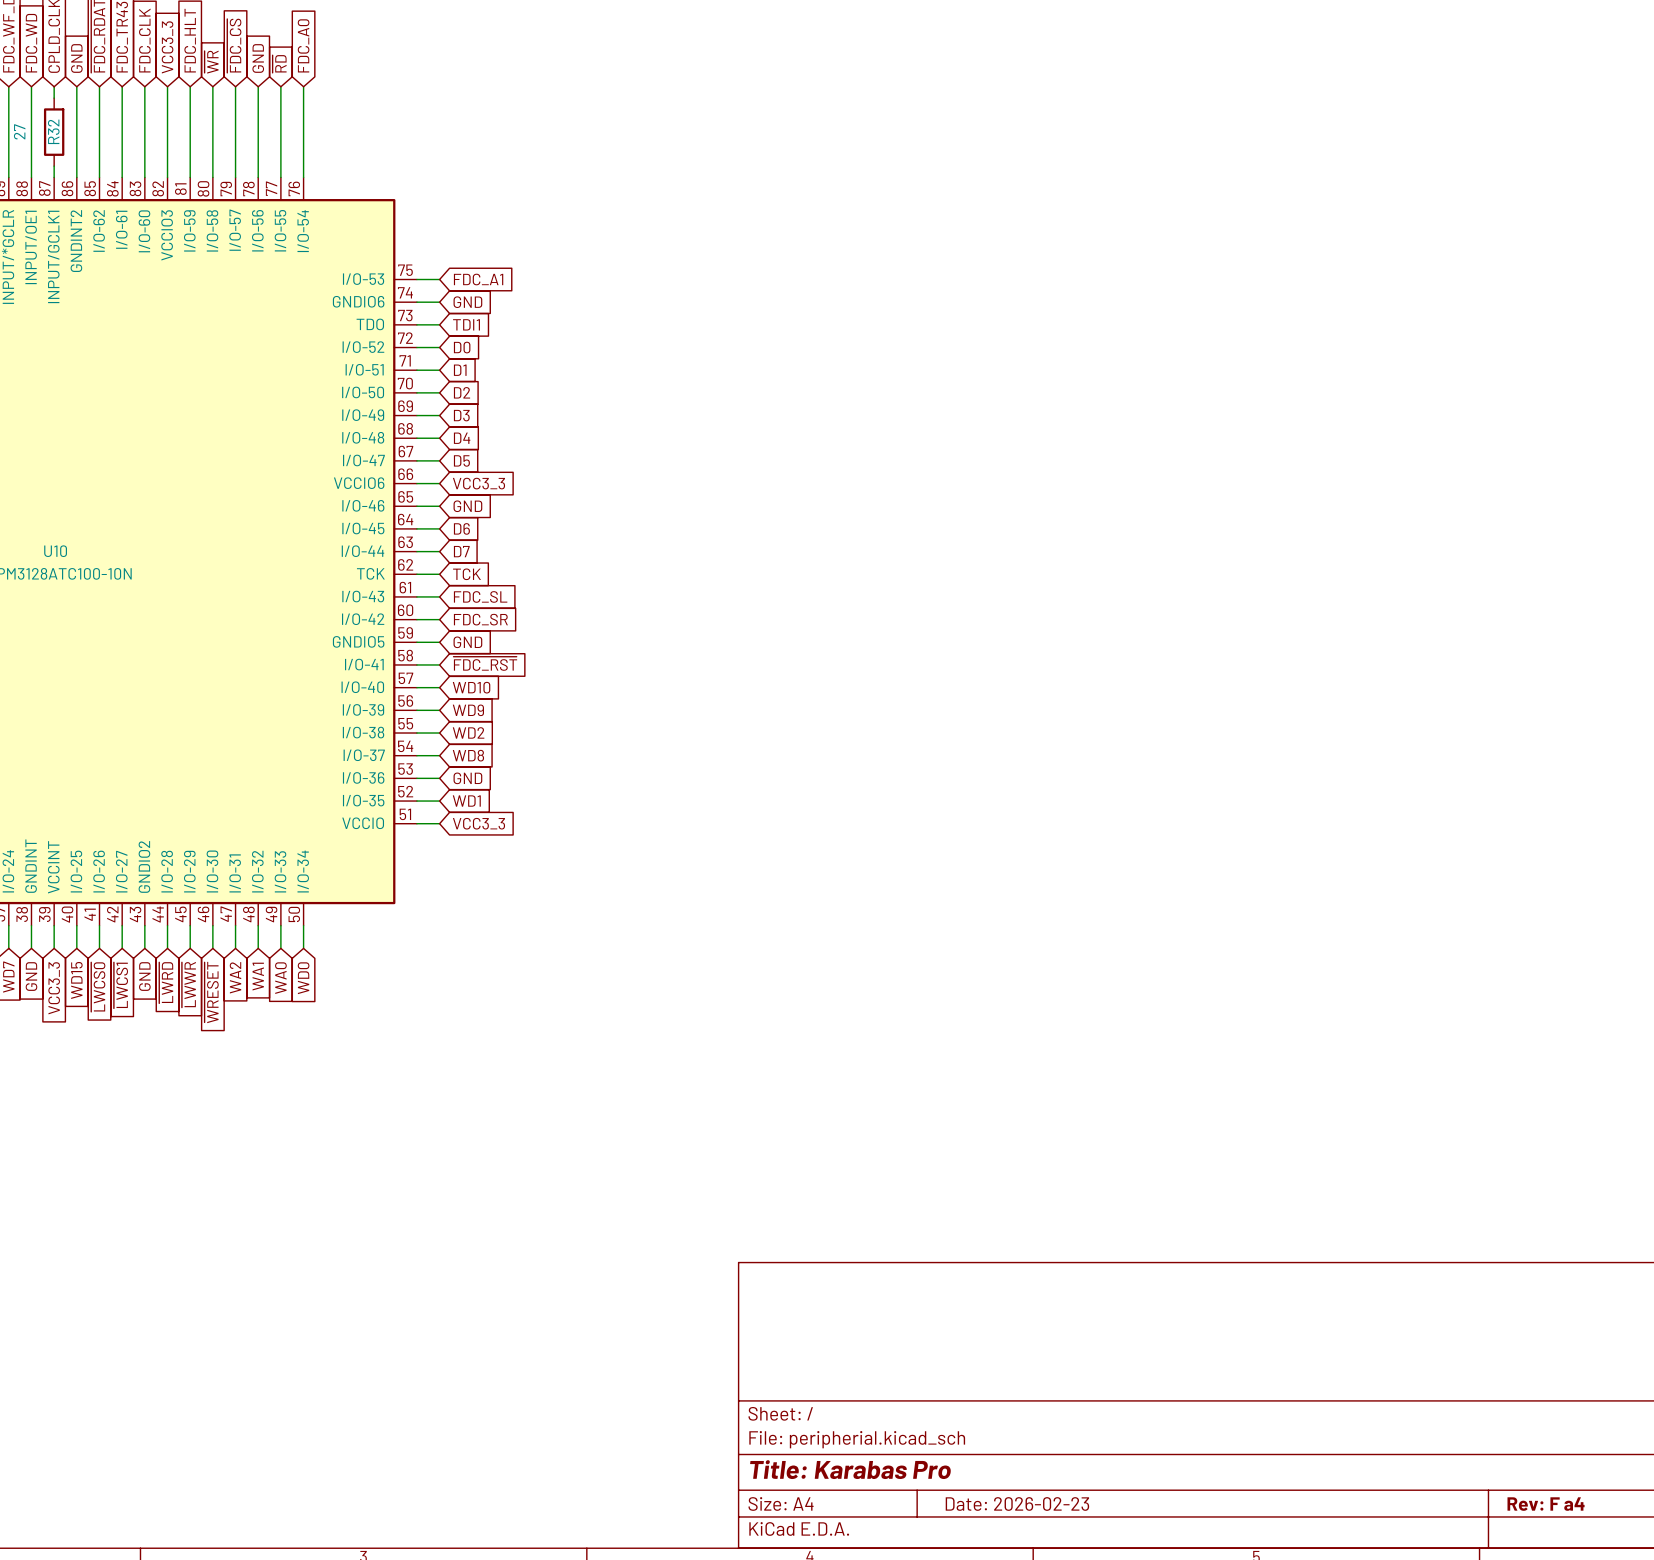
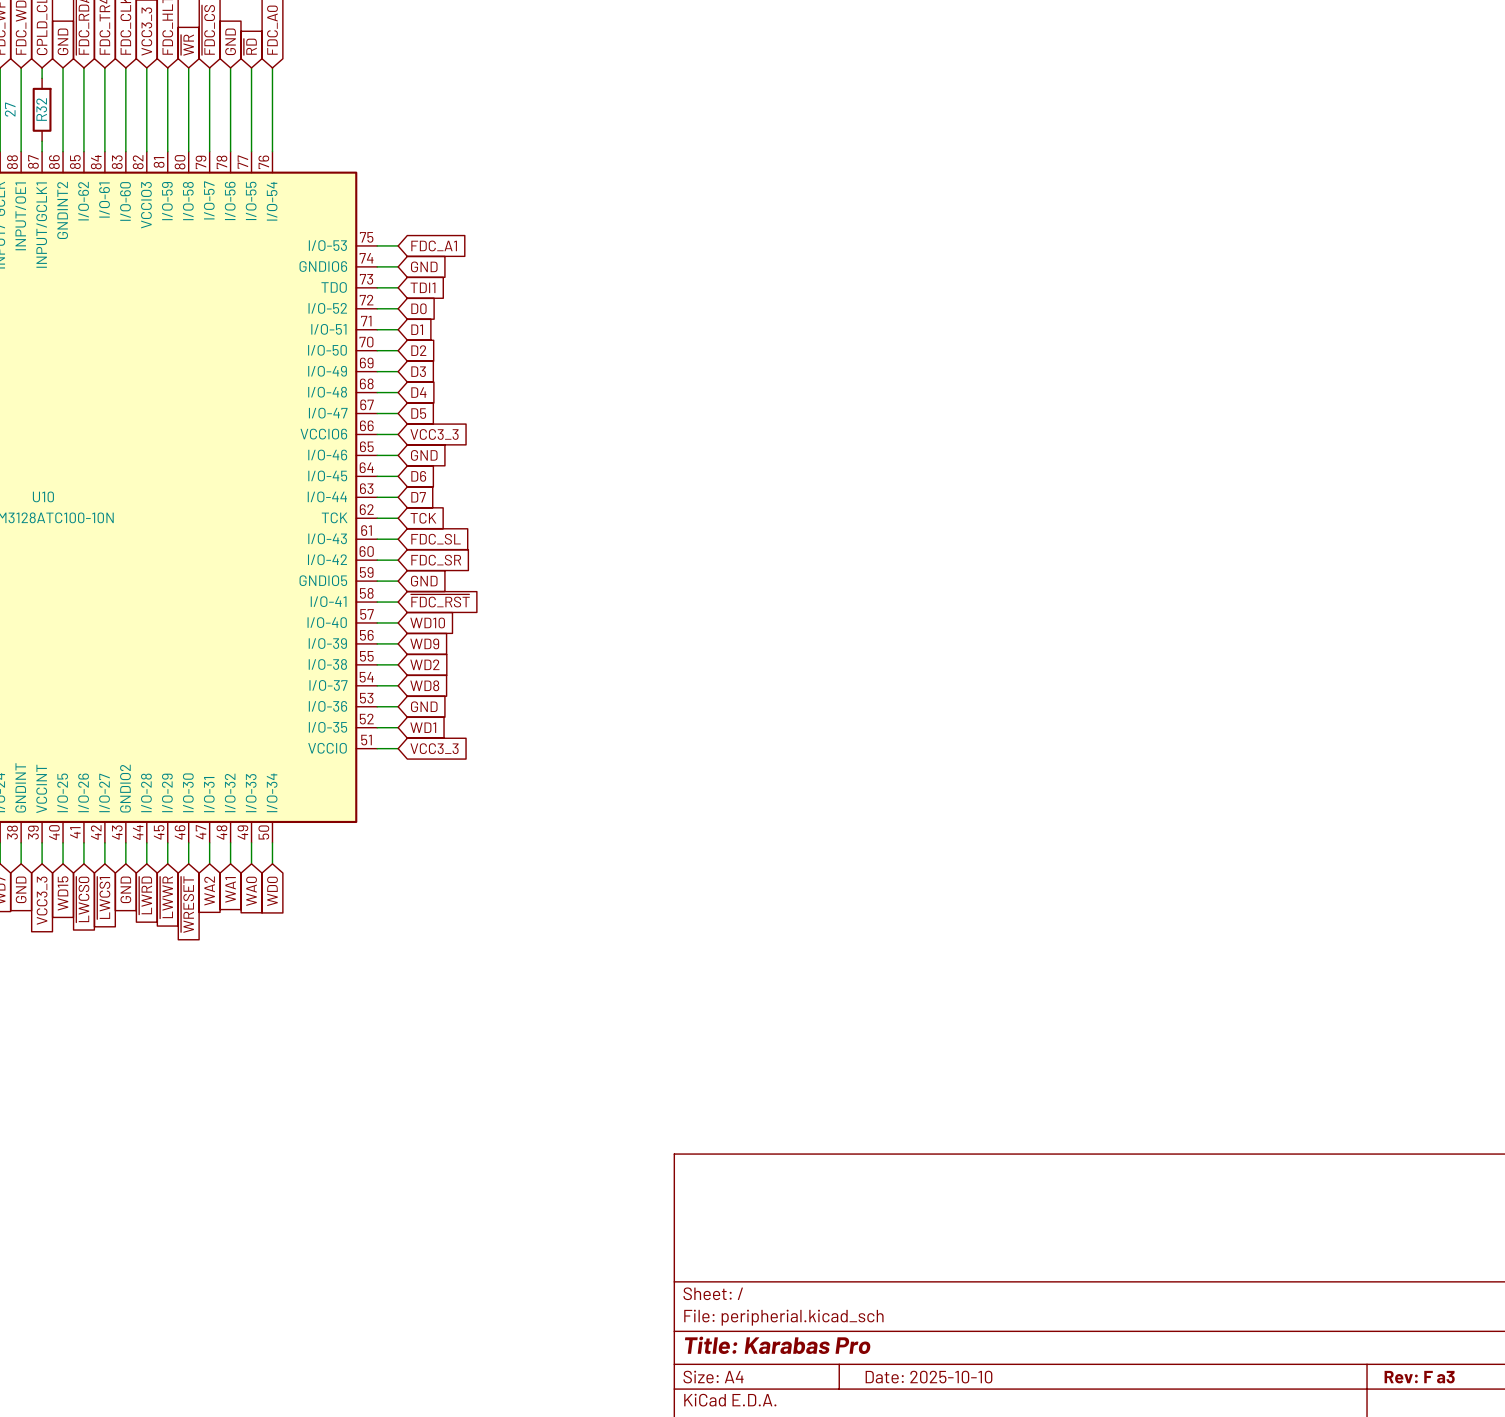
title block: Date: 2026-02-23 (1017, 1503) -> Date: 2025-10-10 (928, 1377)
title block: Rev: F a4 (1546, 1504) -> Rev: F a3 (1419, 1377)

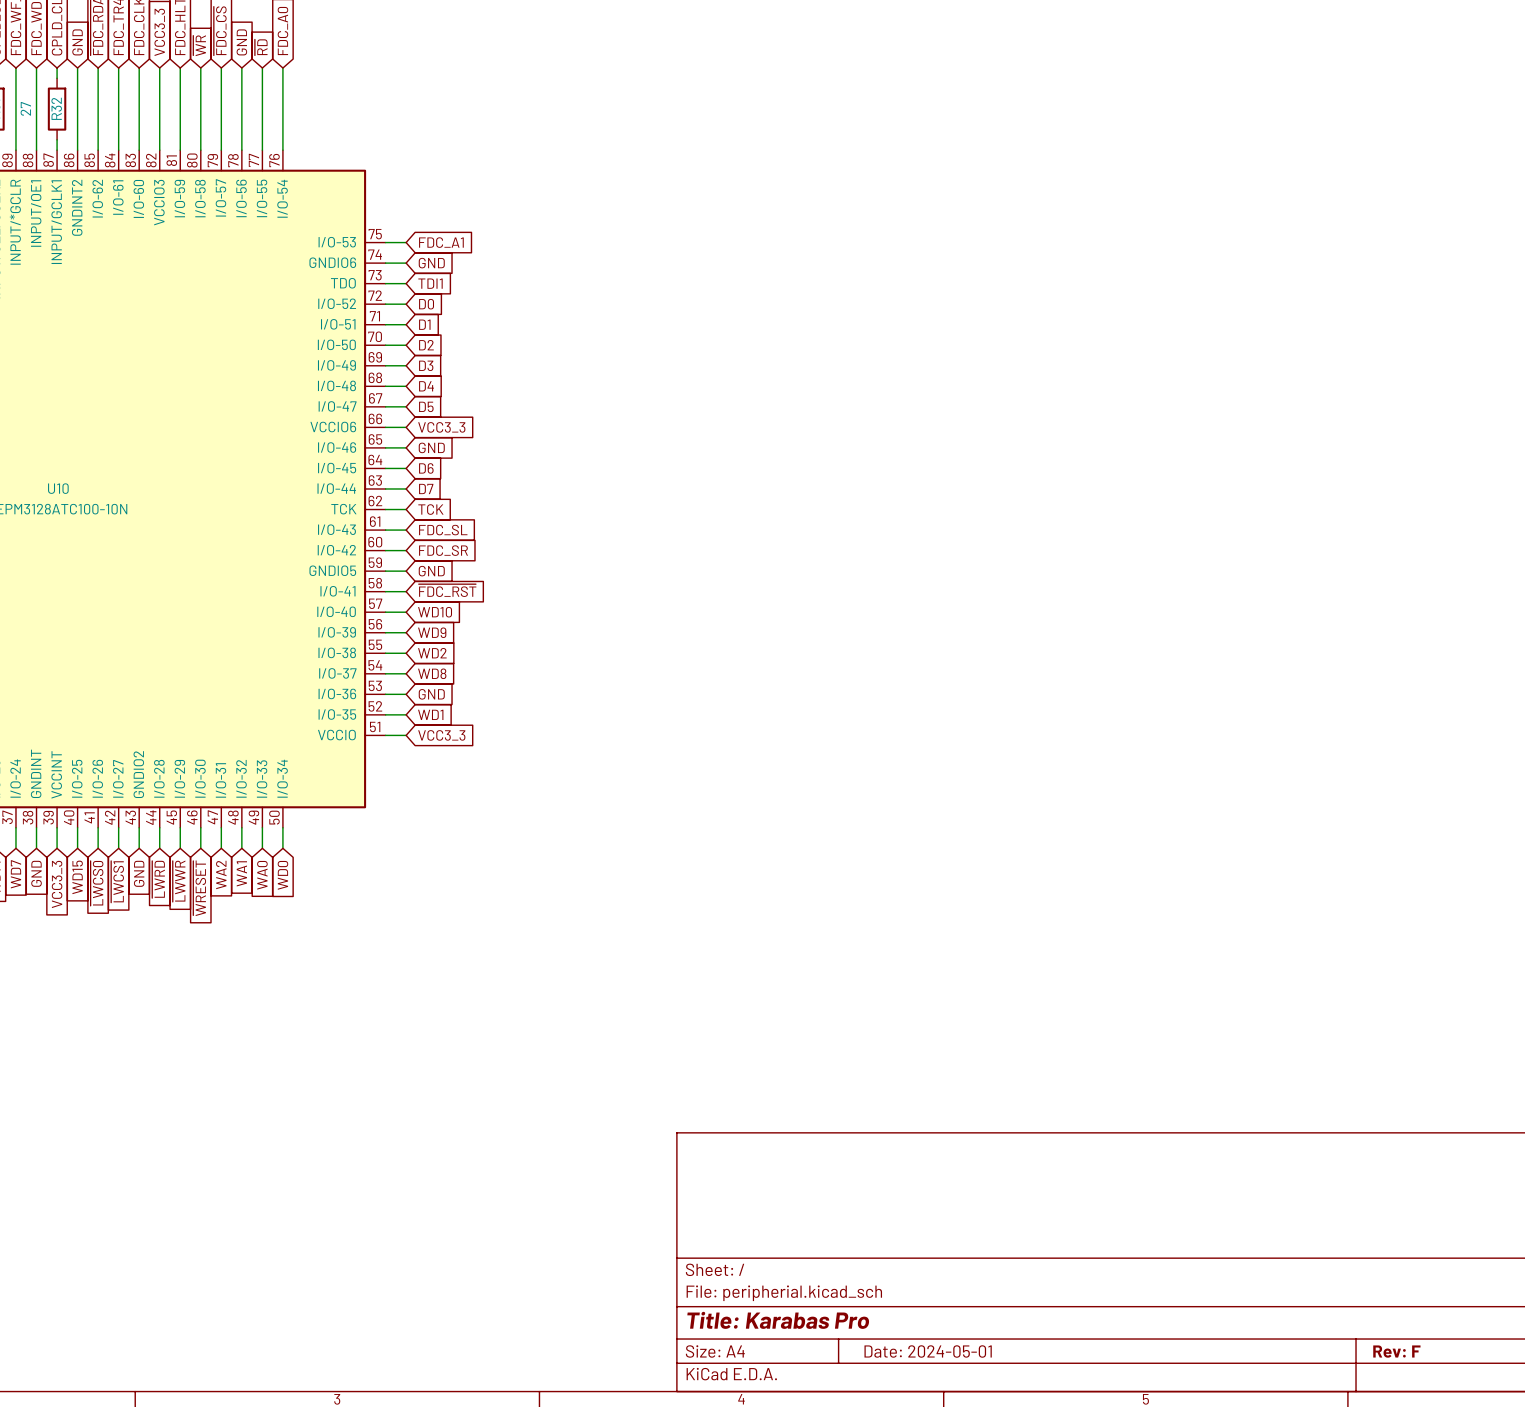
title block: Date: 2025-10-10 (928, 1377) -> Date: 2024-05-01 (928, 1351)
title block: Rev: F a3 (1419, 1377) -> Rev: F (1396, 1351)

